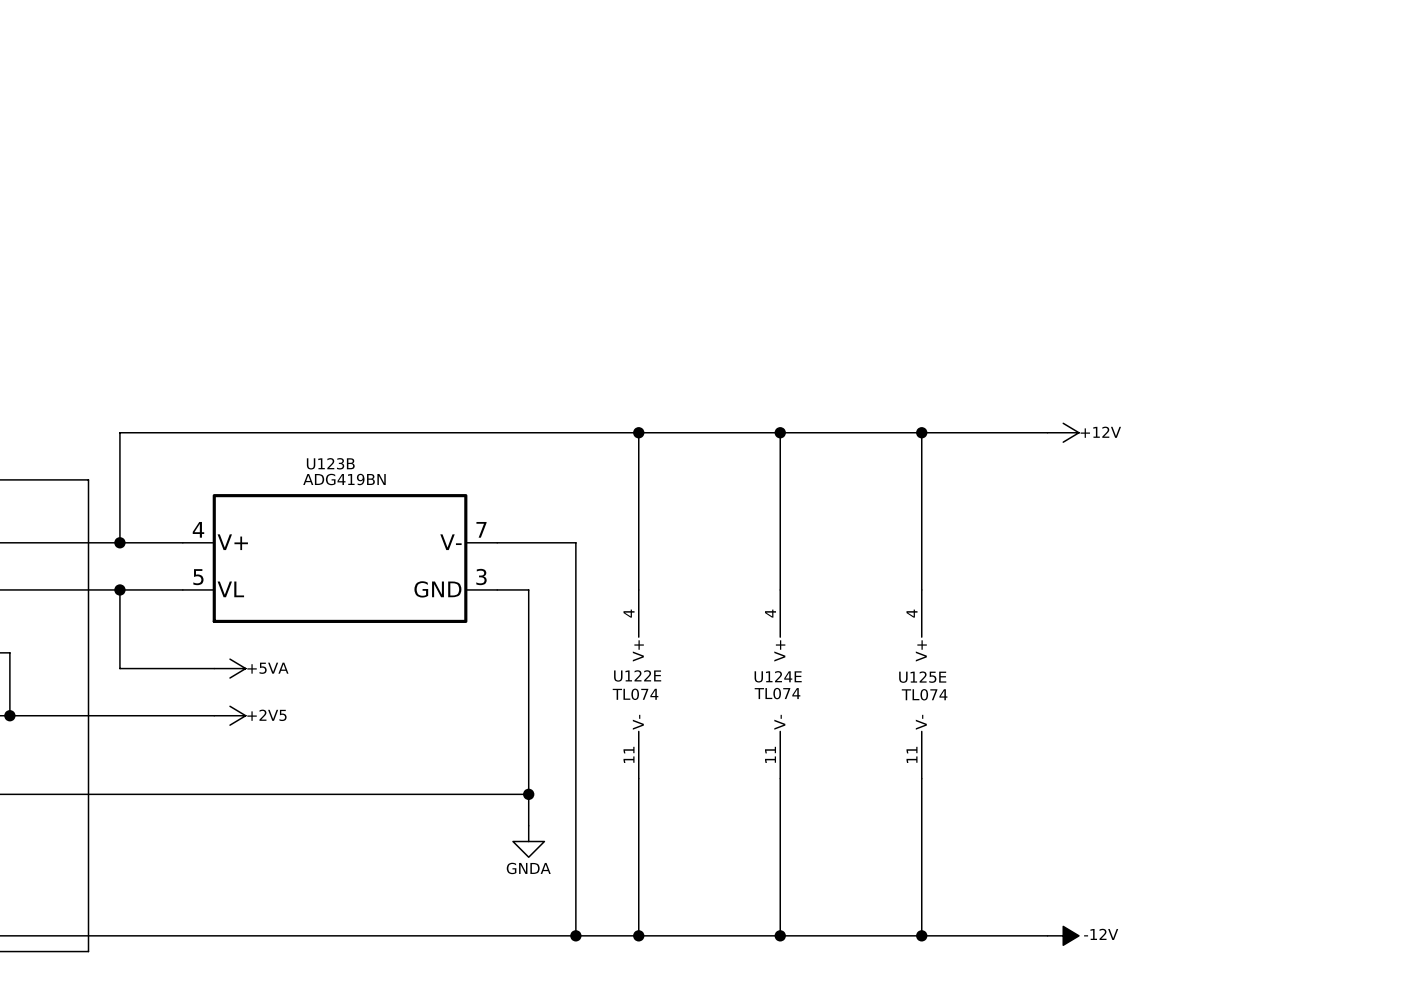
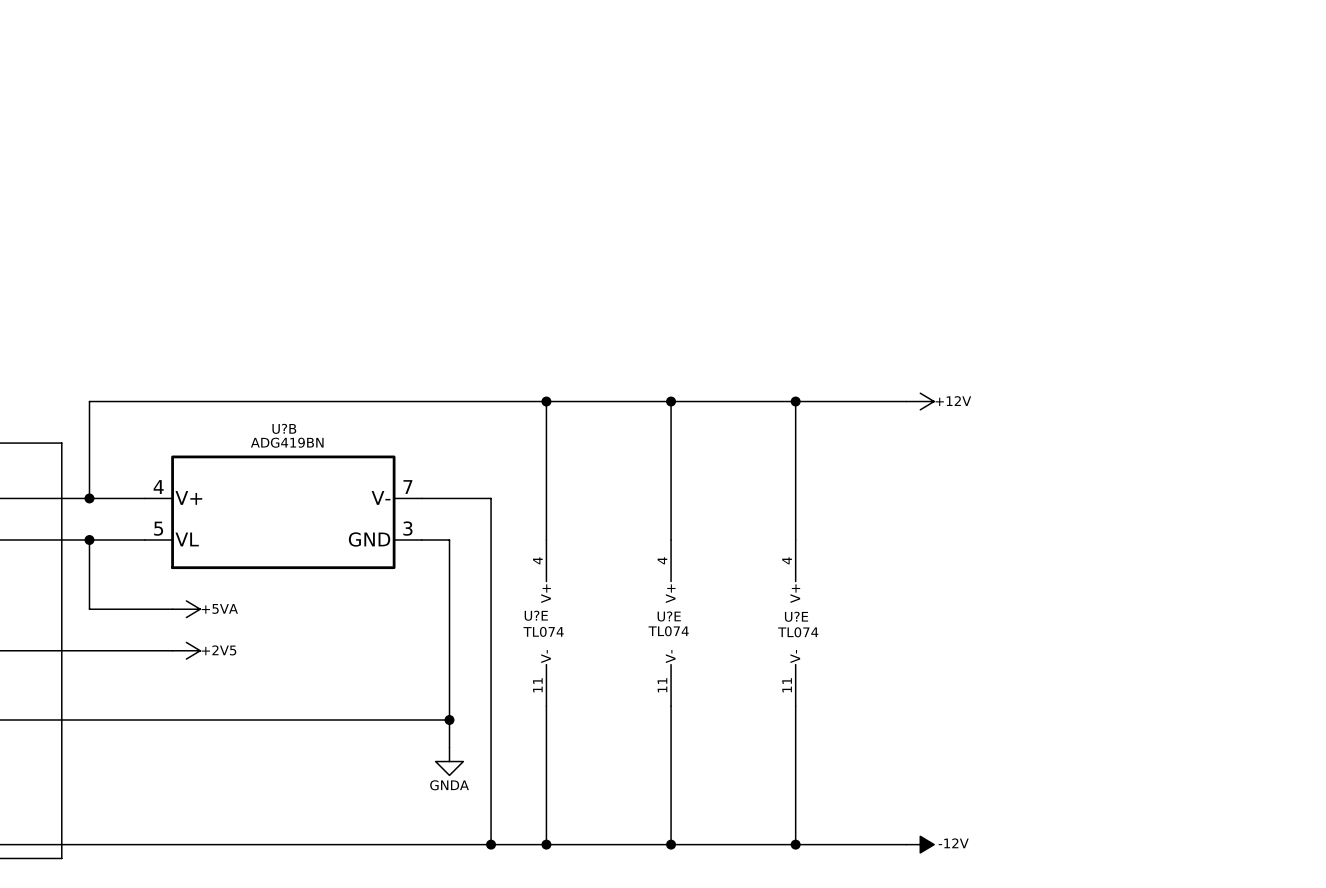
U123B name: U123B (330, 463) -> U?B (284, 428)
U122E name: U122E (637, 675) -> U?E (536, 615)
U124E name: U124E (778, 676) -> U?E (669, 616)
U125E name: U125E (922, 677) -> U?E (796, 616)

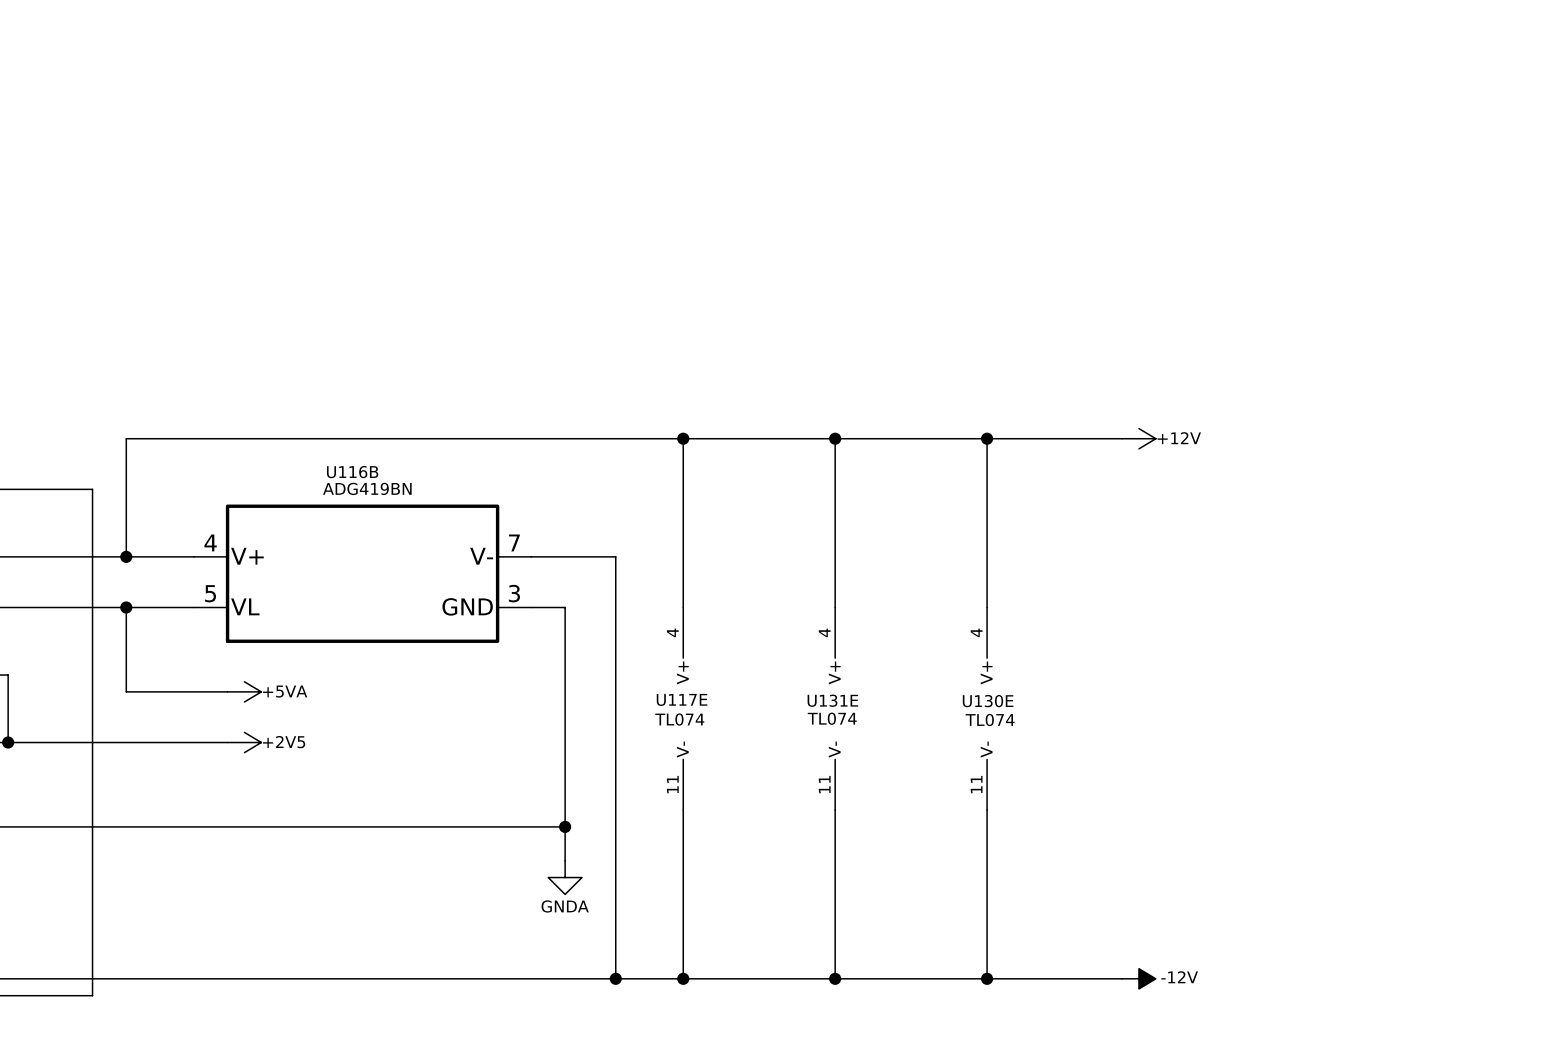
U?B name: U?B (284, 428) -> U116B (352, 472)
U?E name: U?E (536, 615) -> U117E (682, 699)
U?E name: U?E (669, 616) -> U131E (832, 700)
U?E name: U?E (796, 616) -> U130E (988, 701)

